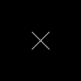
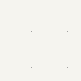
no-connect mark: (40, 40) -> none

